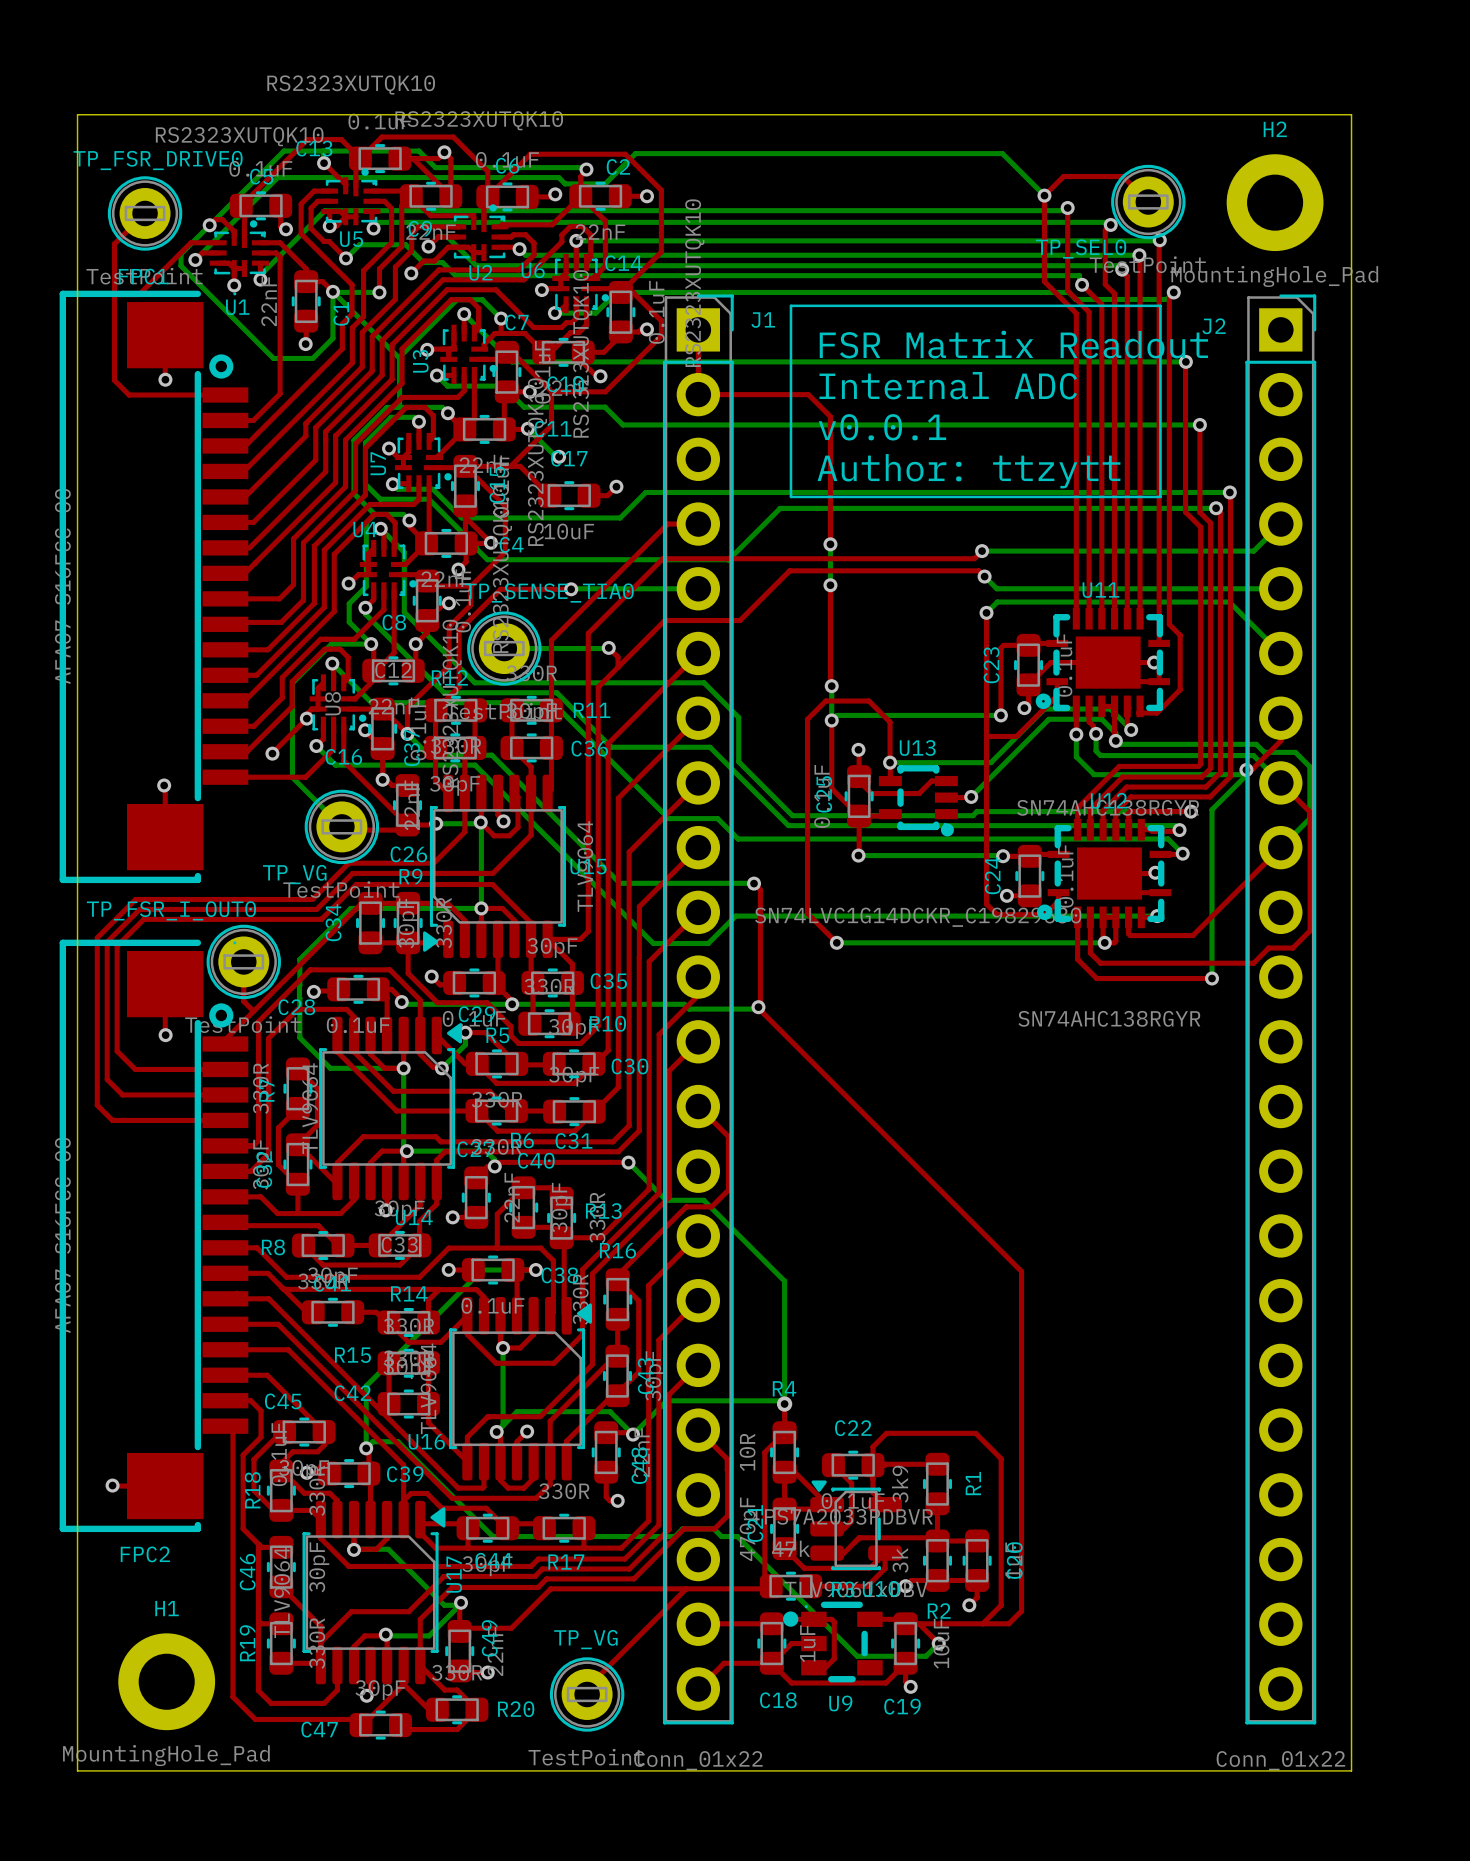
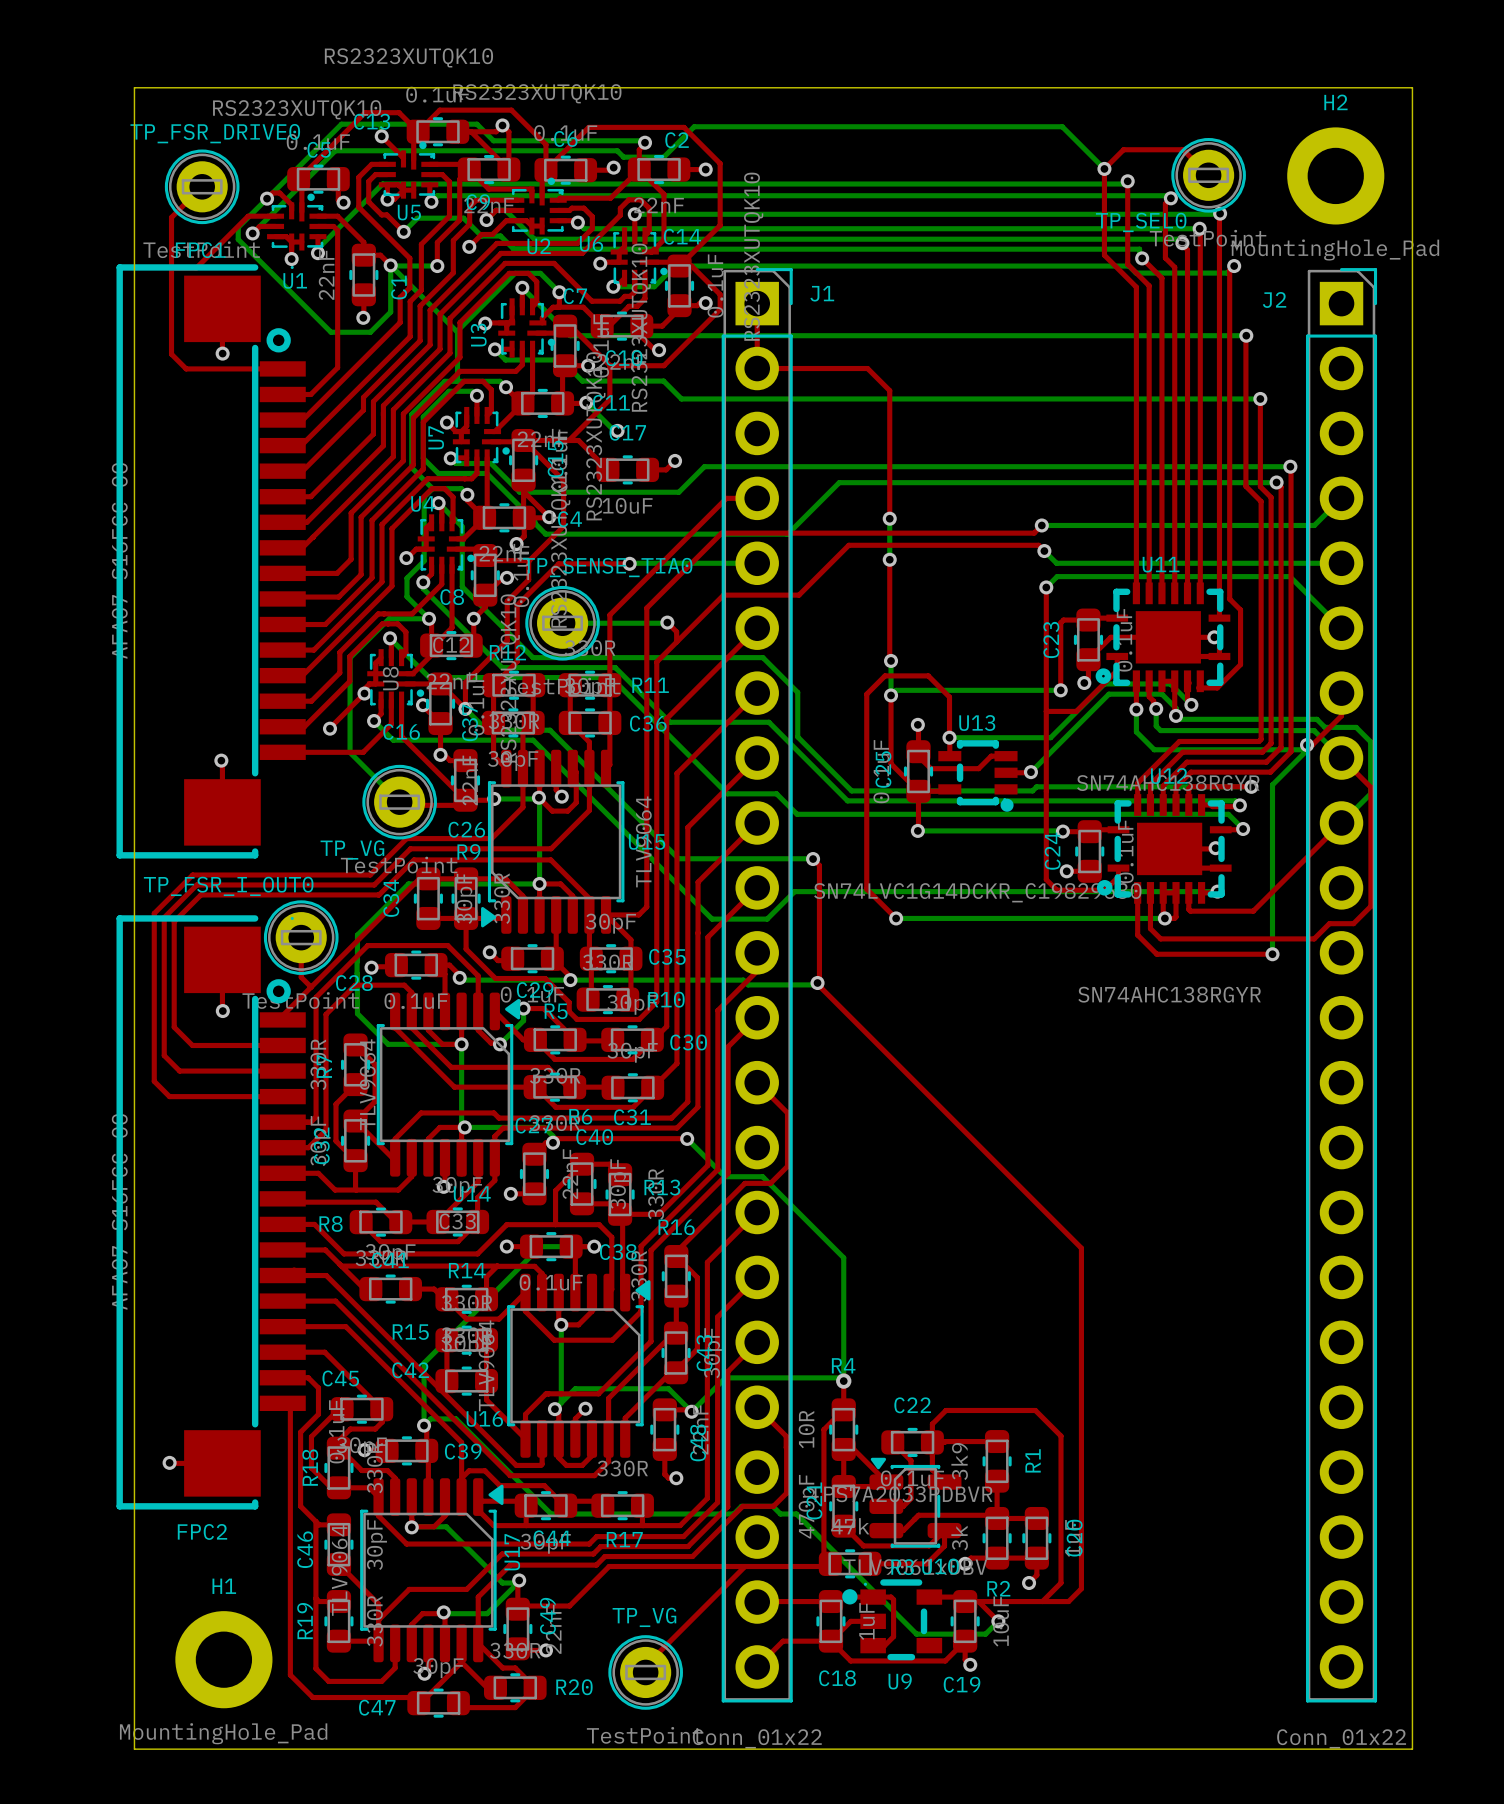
line: (790, 305) (1160, 305) (1160, 496) (790, 496) (790, 305) -> none
text: FSR Matrix Readout (1013, 344) -> none
text: Internal ADC (948, 385) -> none
text: v0.0.1 (882, 427) -> none
text: Author: ttzytt (968, 471) -> none

